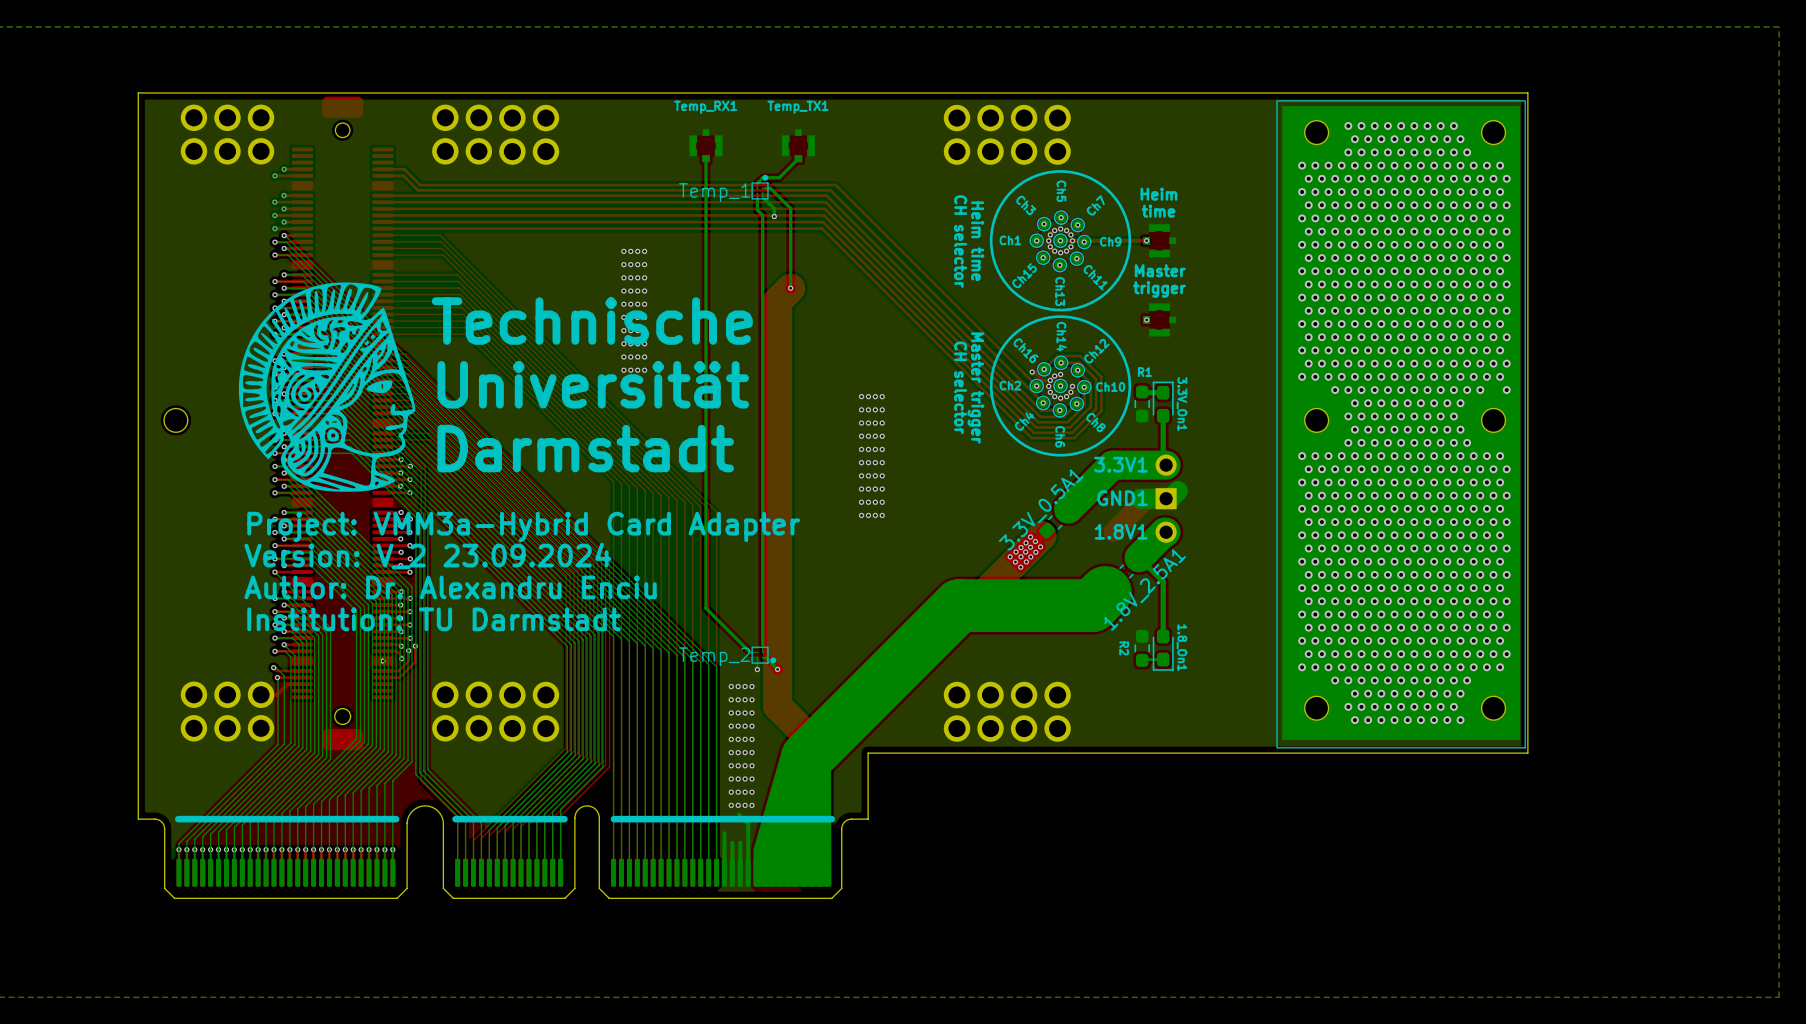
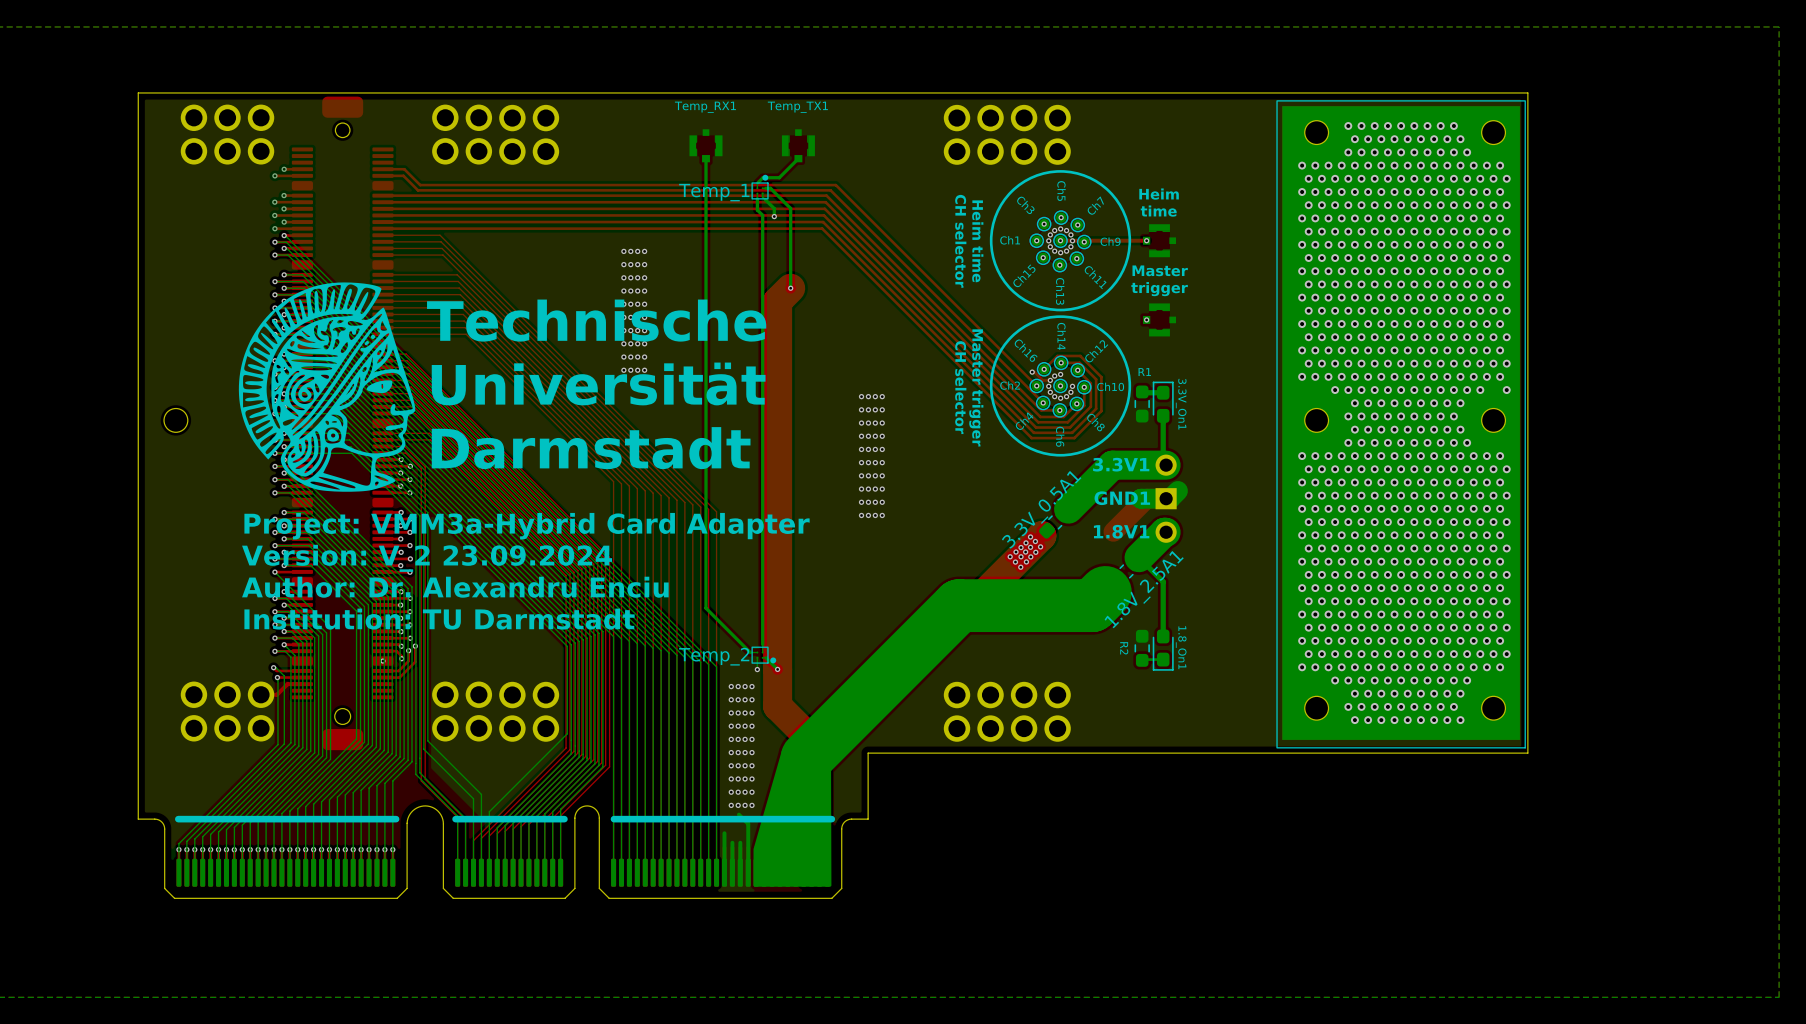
bottom track: (567, 733) (567, 752) (489, 830) -> (567, 733) (489, 811) (489, 830)
bottom track: (427, 740) (427, 769) (481, 823) -> (427, 740) (481, 794) (481, 823)
bottom track: (423, 749) (423, 771) (473, 820) -> (423, 749) (473, 798) (473, 820)

